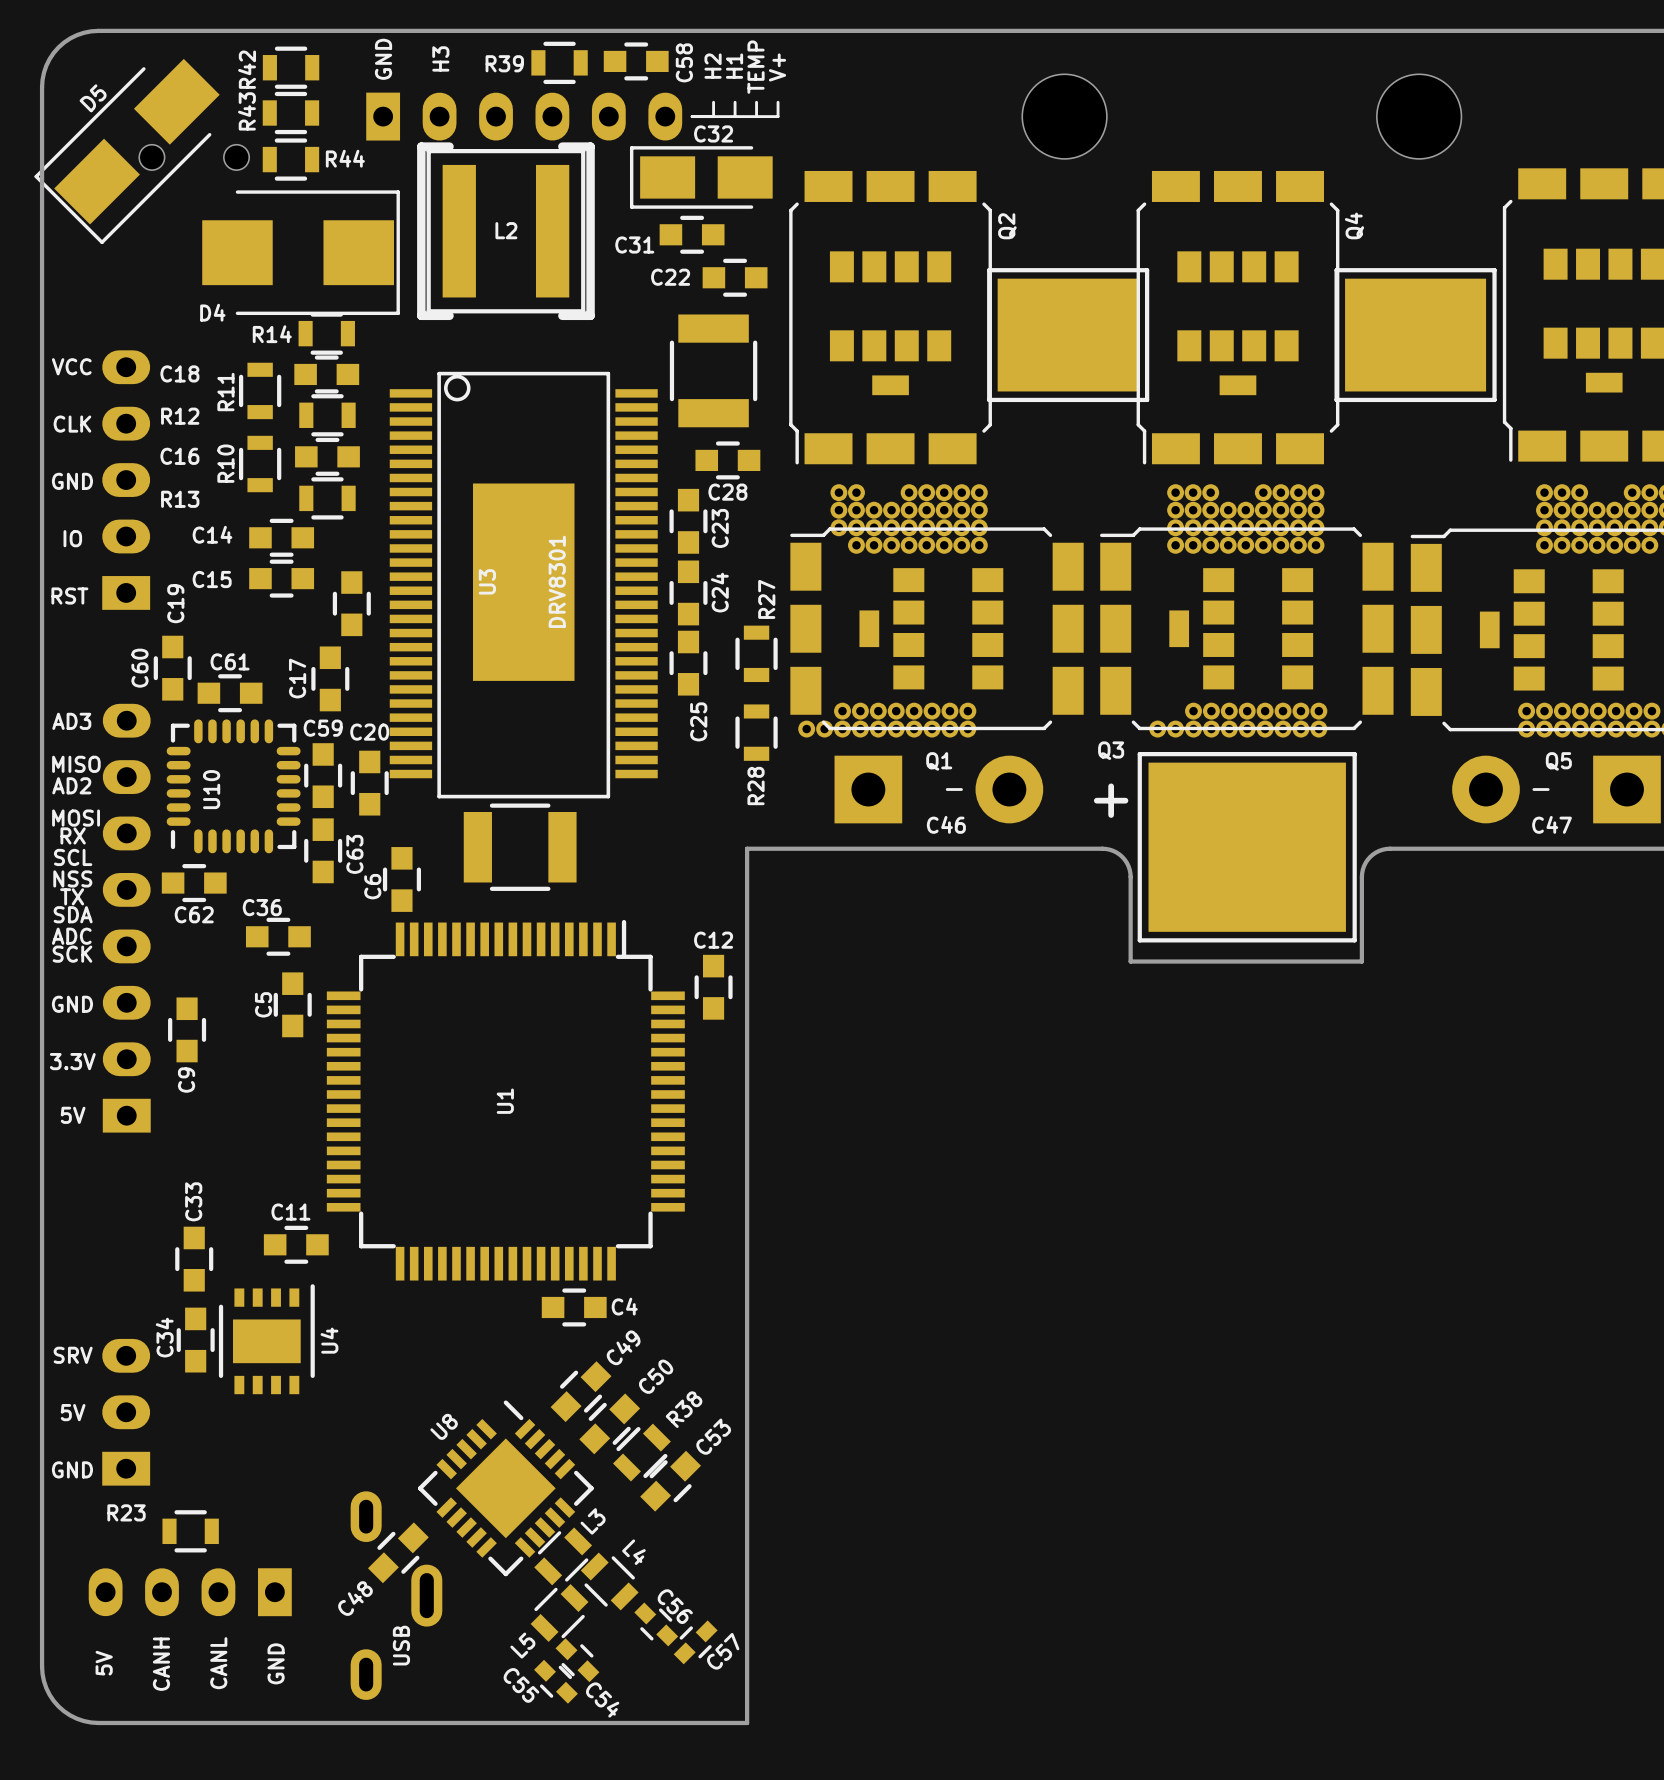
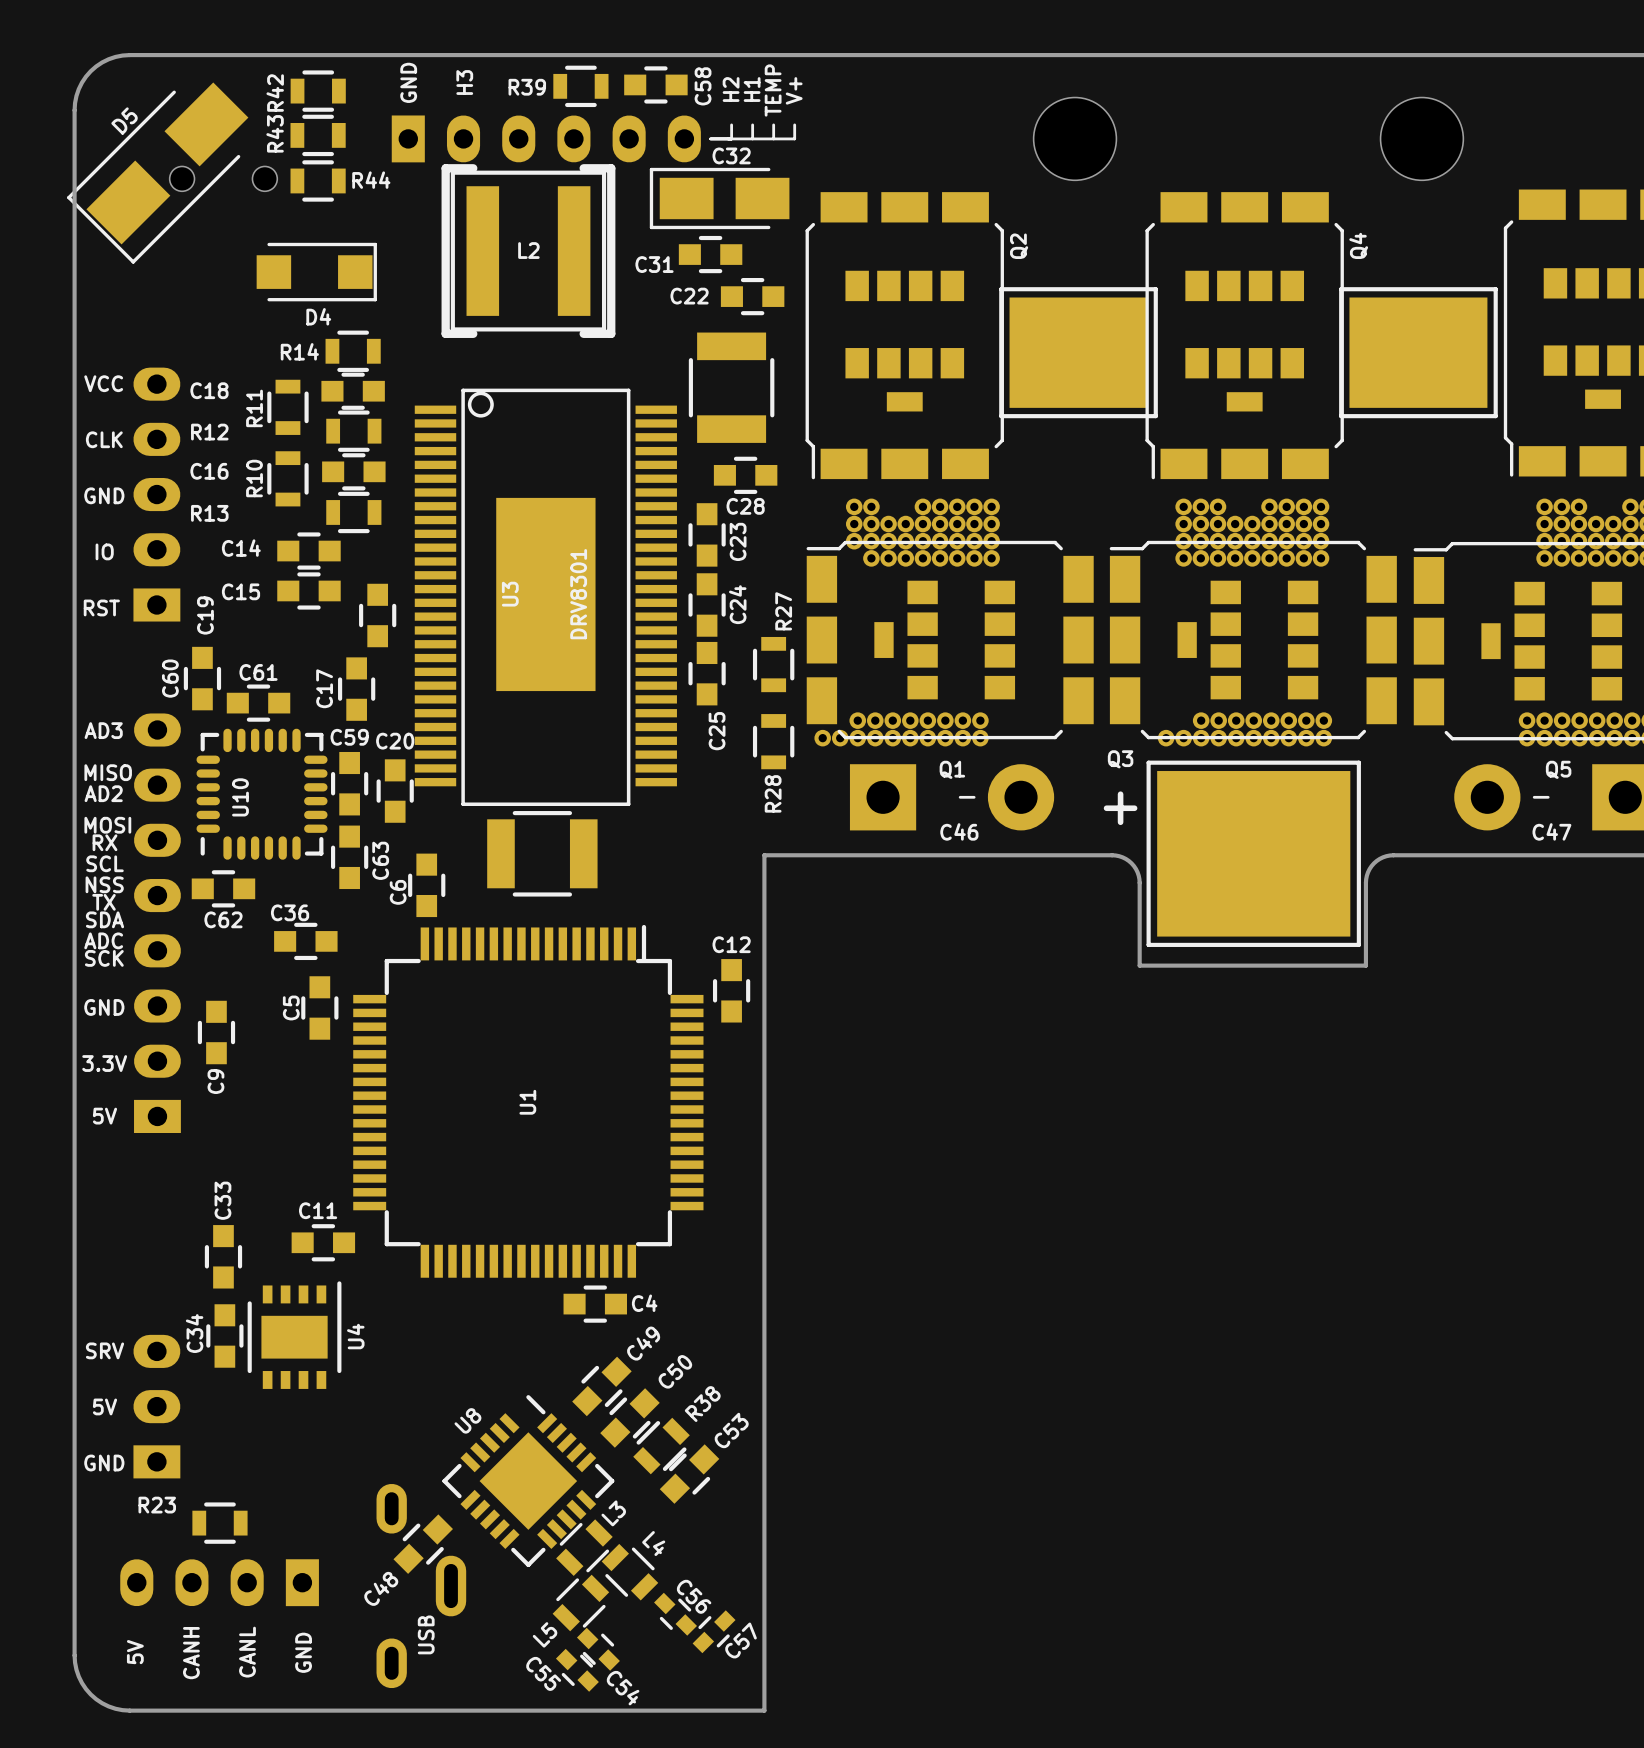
D4 footprint: [202, 190, 400, 316] -> [256, 242, 377, 302]
D4 name position: D4 (212, 312) -> D4 (318, 316)

